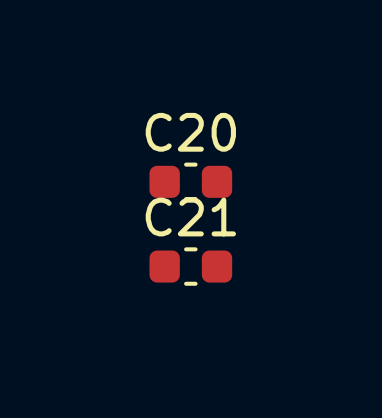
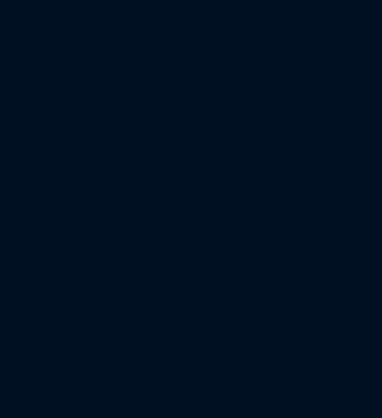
C20: (190, 181) -> none
C21: (190, 266) -> none

